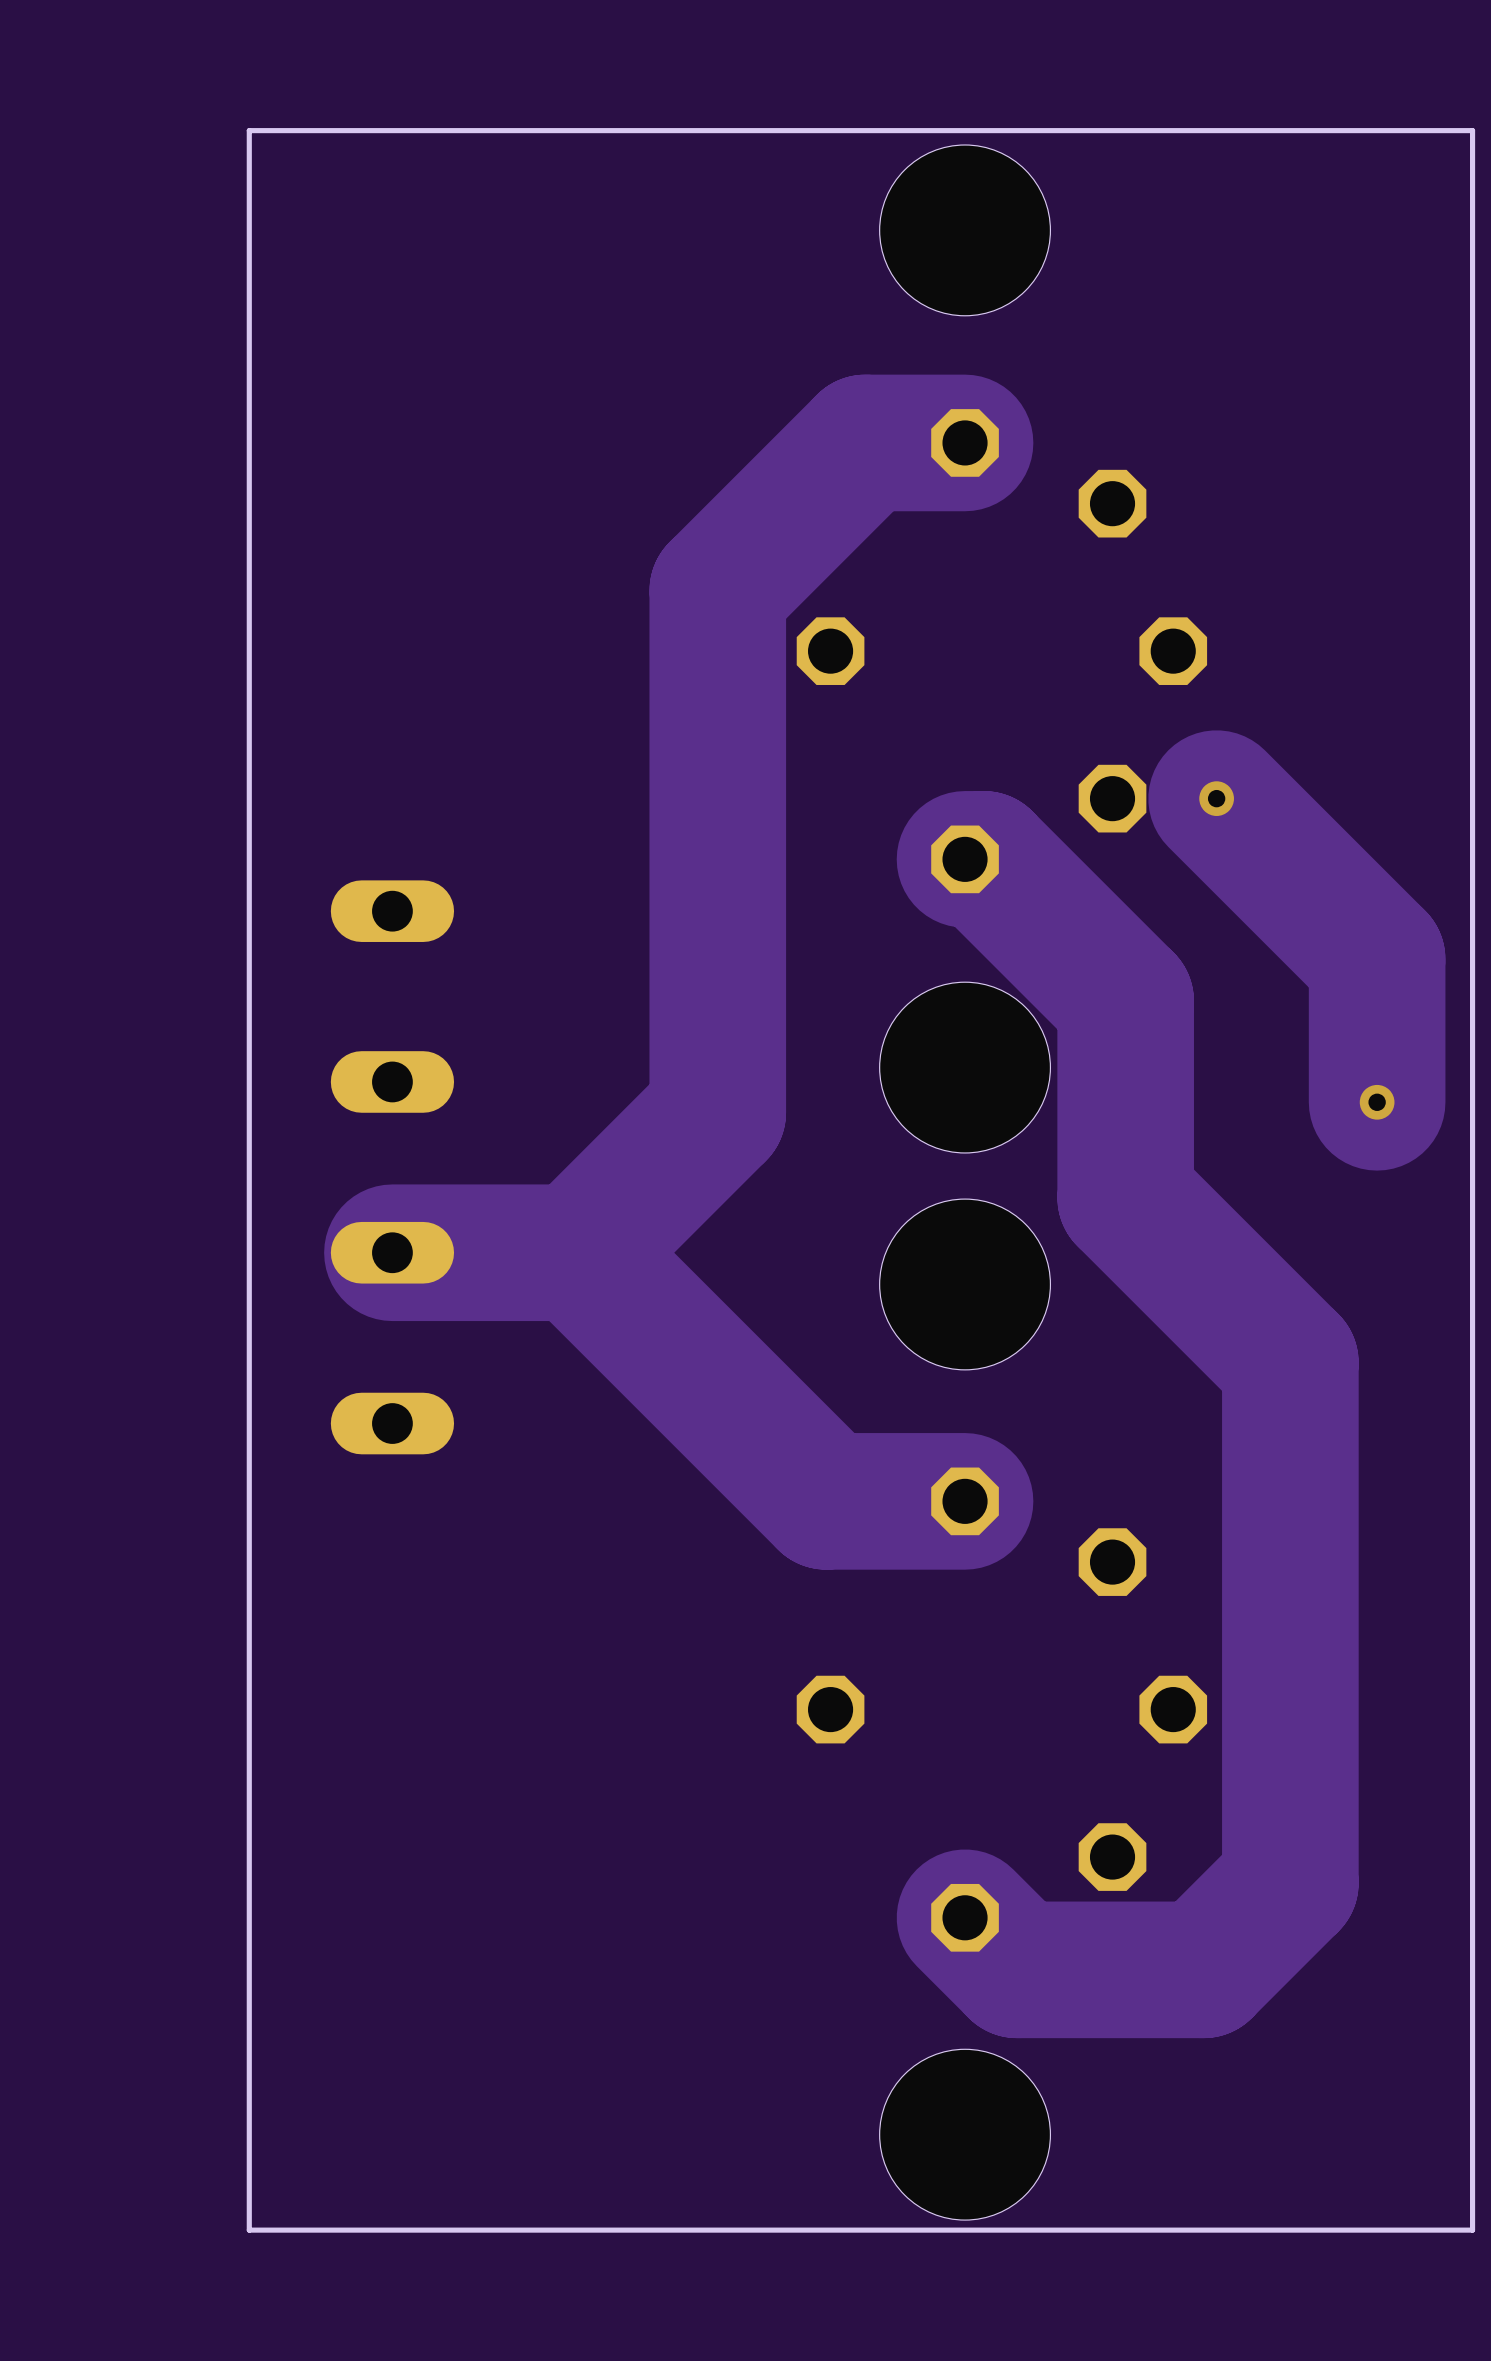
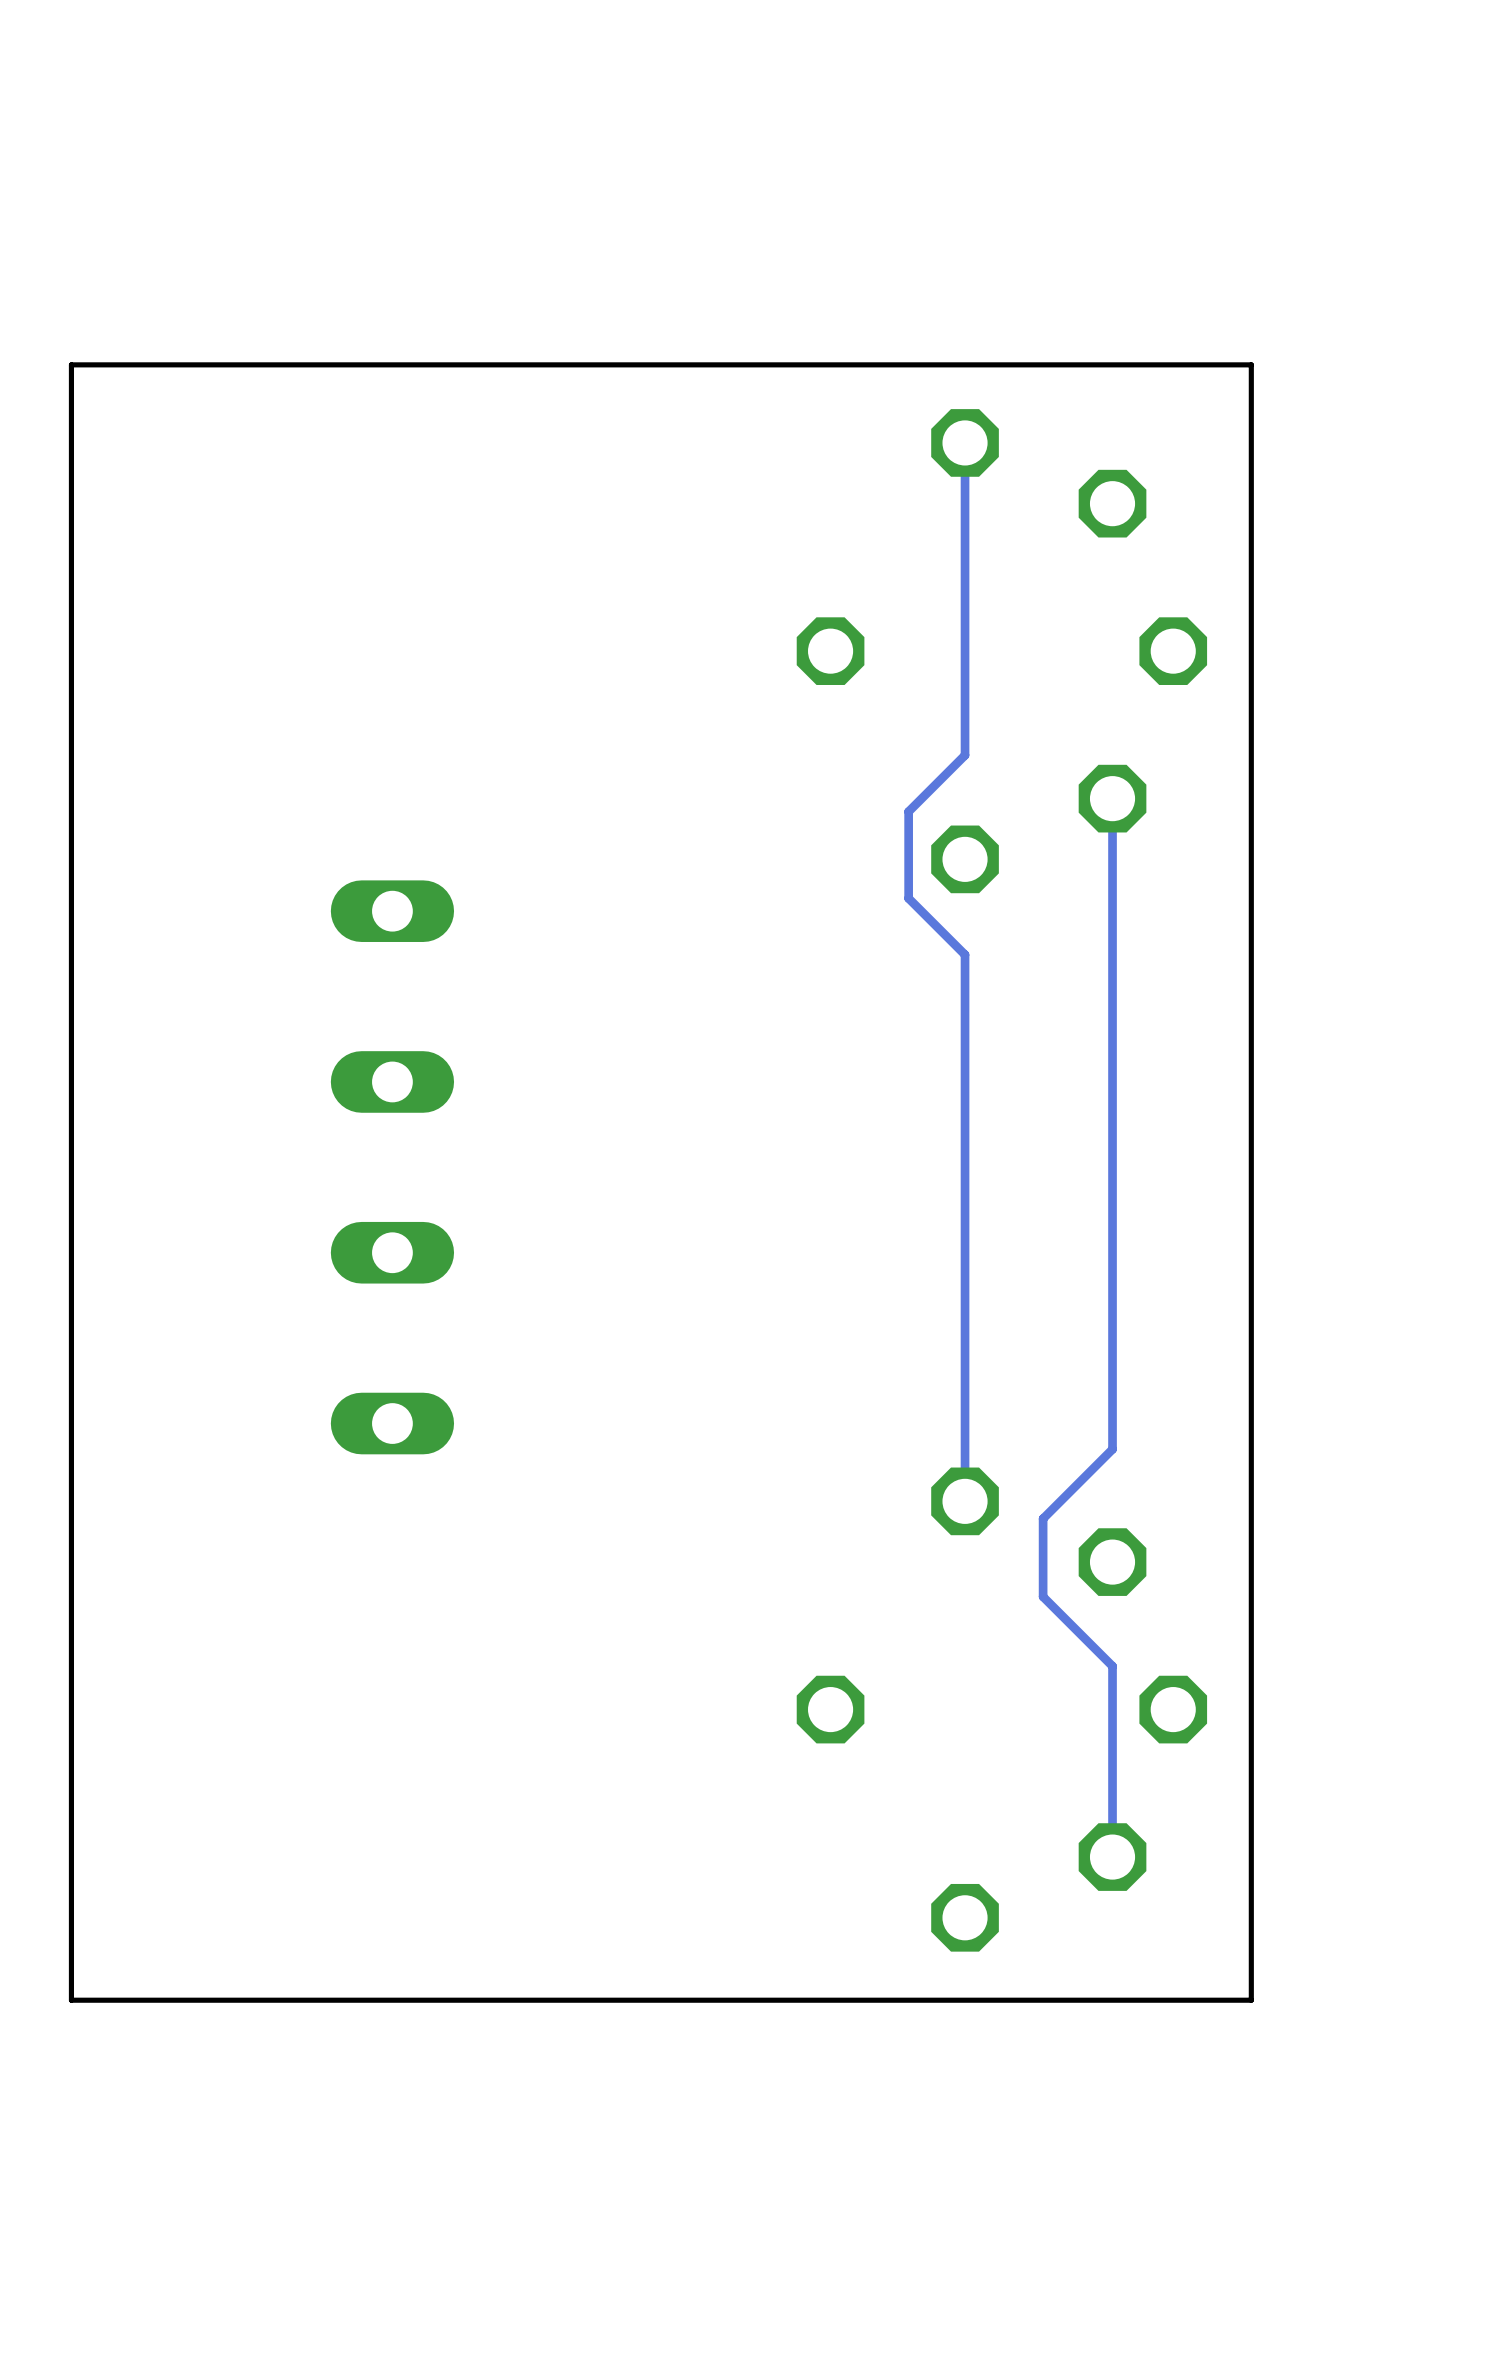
board edge: (1472, 130) (1472, 2230) (249, 2230) (249, 130) (1472, 130) -> (1251, 364) (1251, 2000) (71, 2000) (71, 364) (1251, 364)
hole: (965, 230) -> none
track: (965, 442) (865, 442) (717, 590) (717, 1112) (577, 1252) -> (965, 442) (965, 755) (908, 811) (908, 898) (965, 954) (965, 1501)
track: none -> (1112, 798) (1112, 1449) (1043, 1518) (1043, 1596) (1112, 1666) (1112, 1857)
track: (1216, 798) (1377, 959) (1377, 1102) -> none
via: (1216, 798) -> none
track: (965, 859) (984, 859) (1125, 1001) (1125, 1197) (1290, 1362) (1290, 1883) (1203, 1969) (1017, 1969) (965, 1917) -> none
hole: (965, 1067) -> none
via: (1377, 1102) -> none
track: (577, 1252) (392, 1252) -> none
track: (577, 1252) (826, 1501) (965, 1501) -> none
hole: (965, 1284) -> none
hole: (965, 2134) -> none

